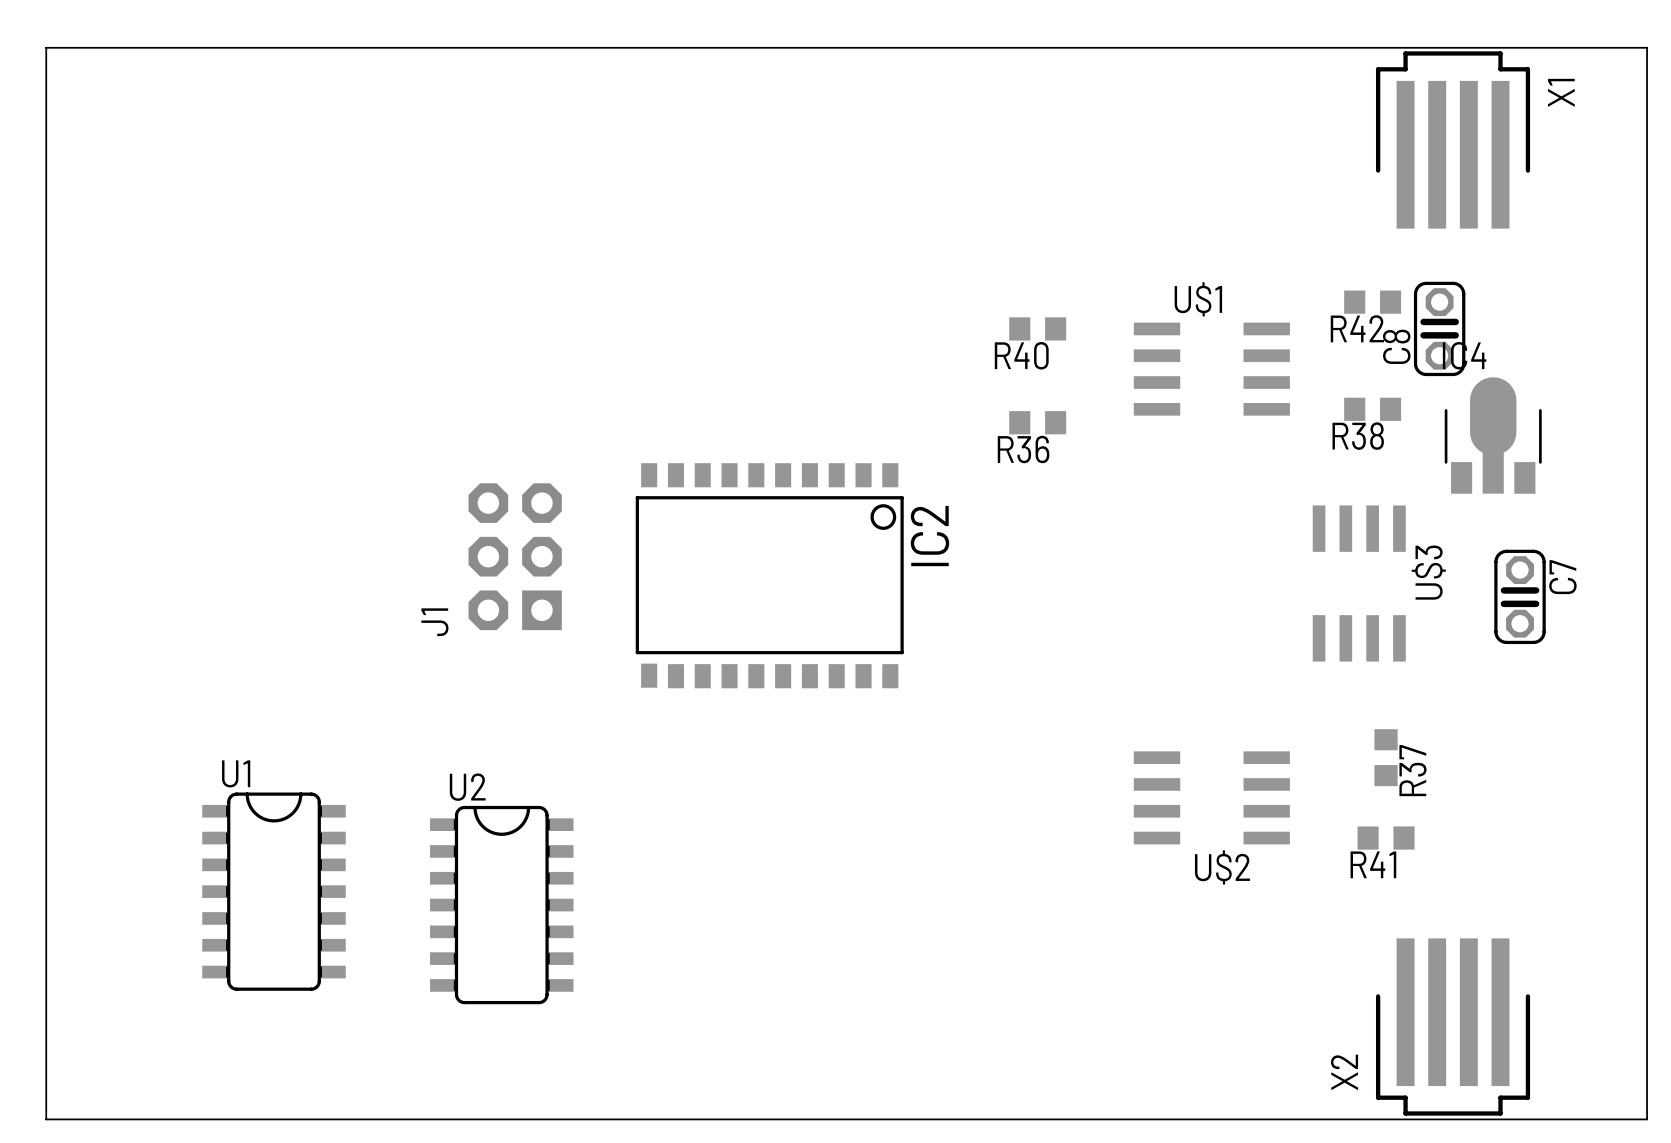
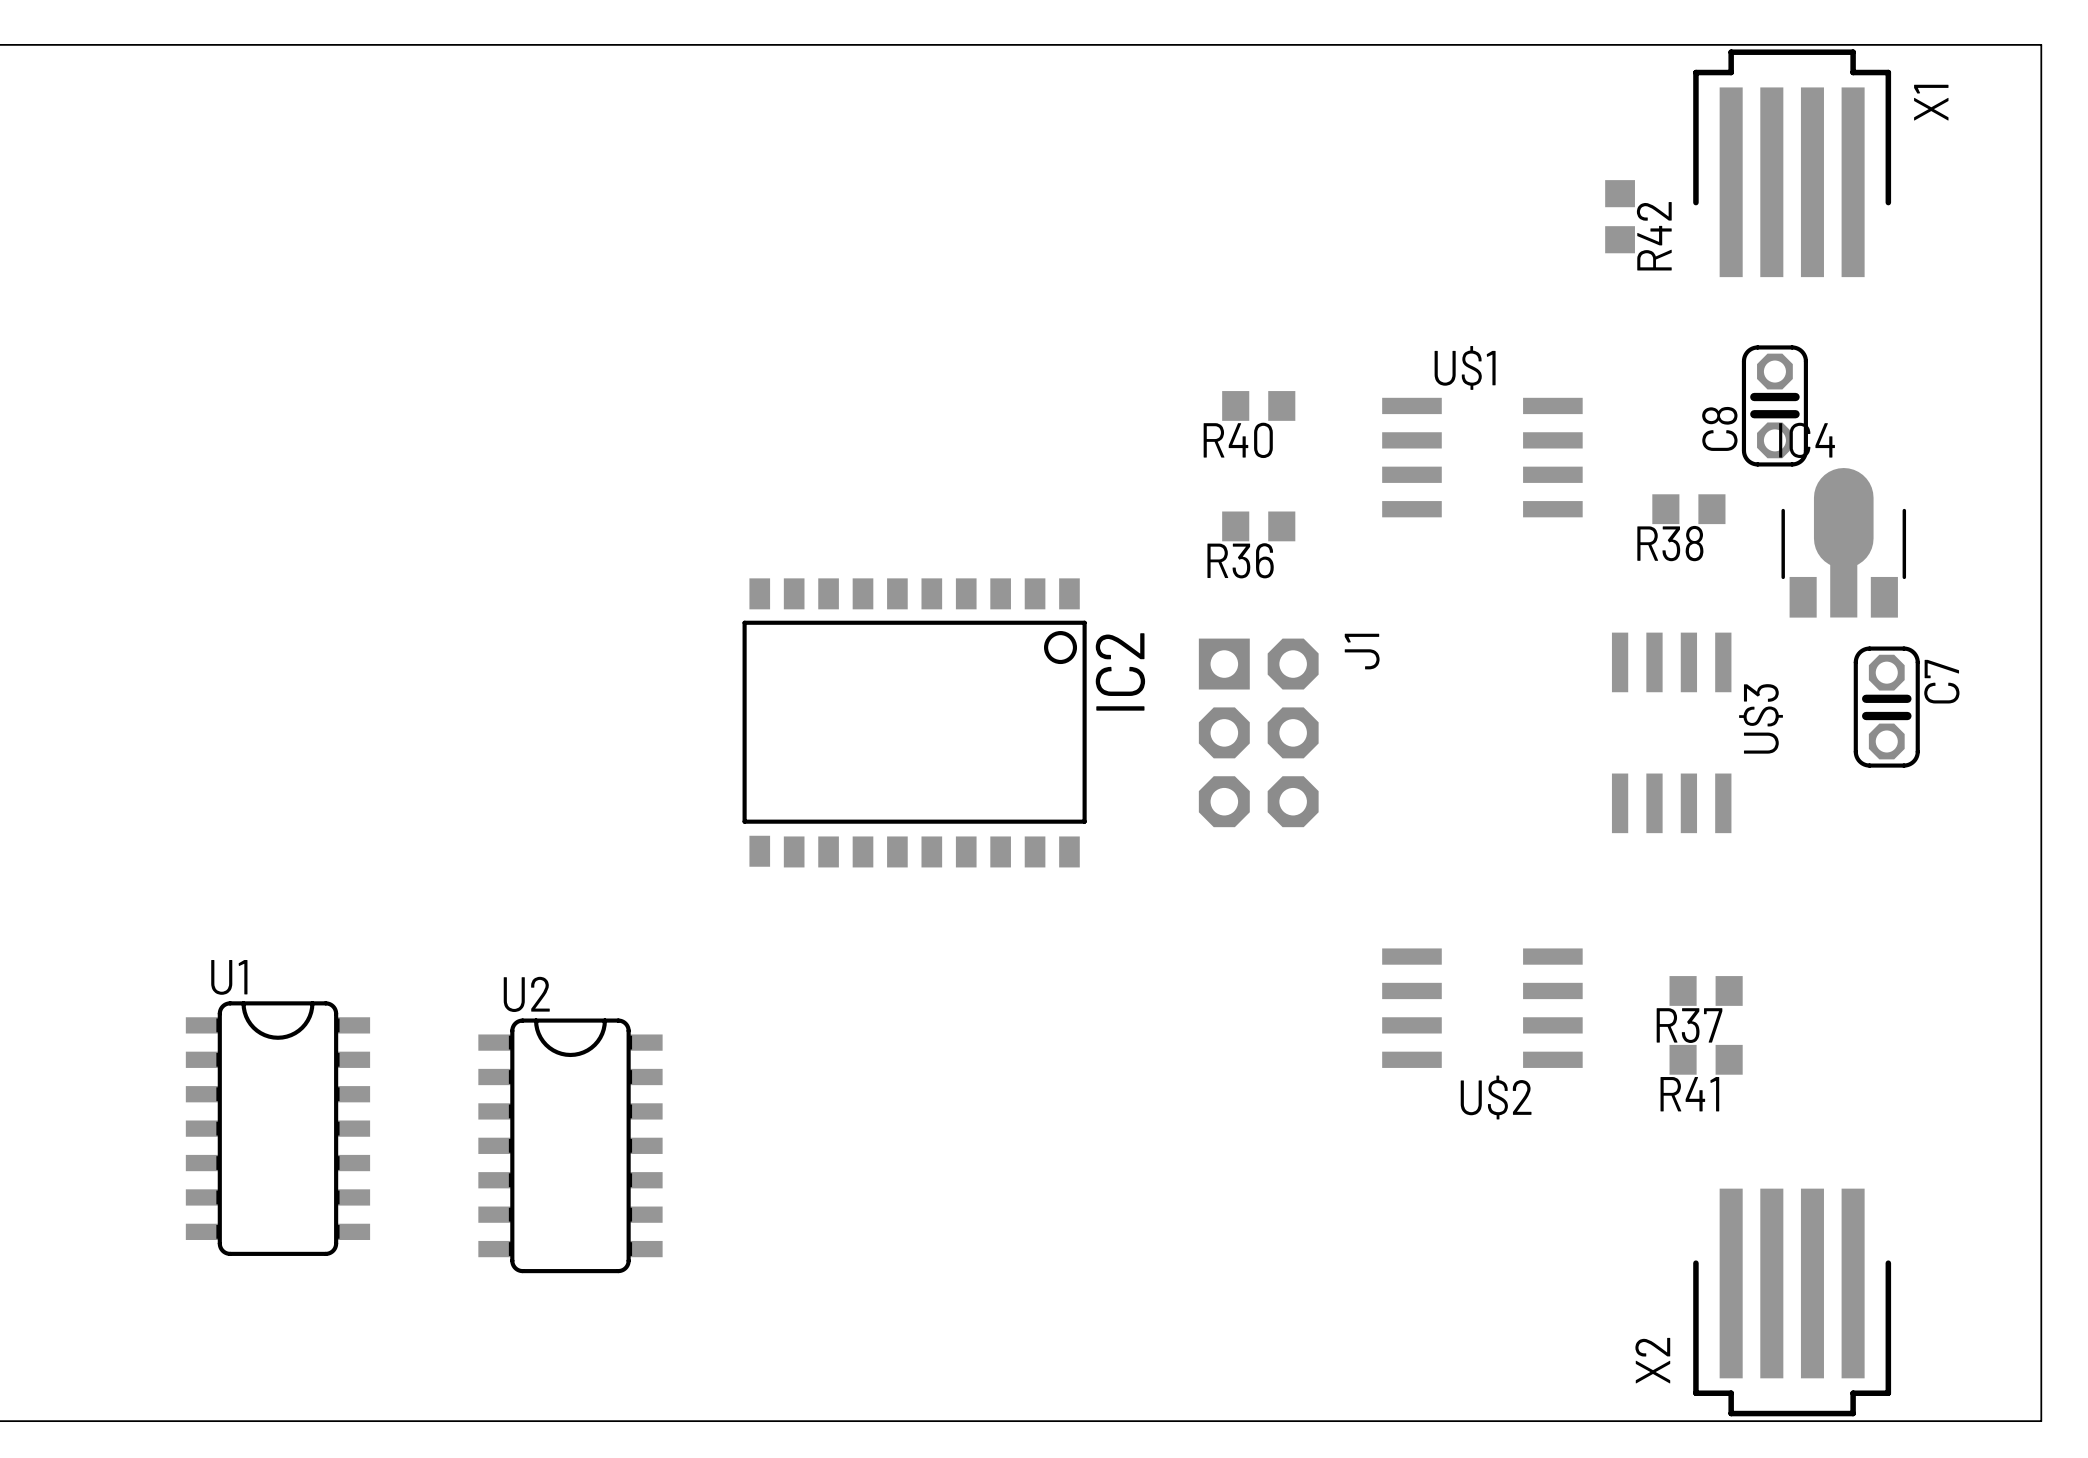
R42 rotation: 0° (1372, 302) -> 90° clockwise (1620, 216)
R42 position: (1372, 302) -> (1620, 216)
R42 name position: R42 (1357, 328) -> R42 (1654, 236)
J1 rotation: 0° (515, 556) -> 180° (1258, 732)
J1 position: (515, 556) -> (1258, 732)
C7 position: (1520, 596) -> (1886, 707)
R37 rotation: 0° (1386, 757) -> 90° clockwise (1706, 990)

